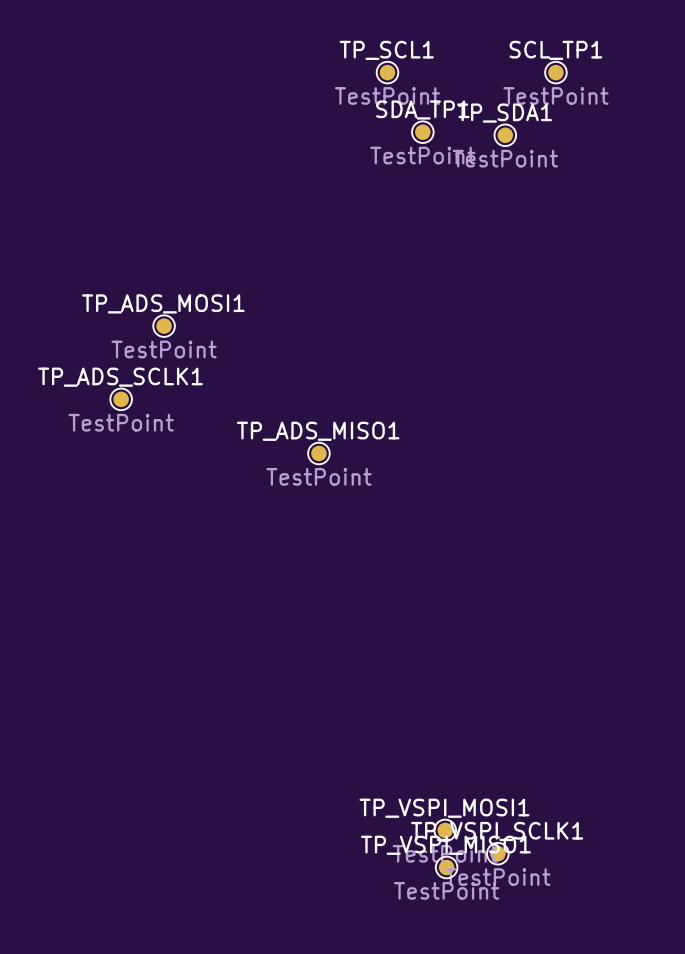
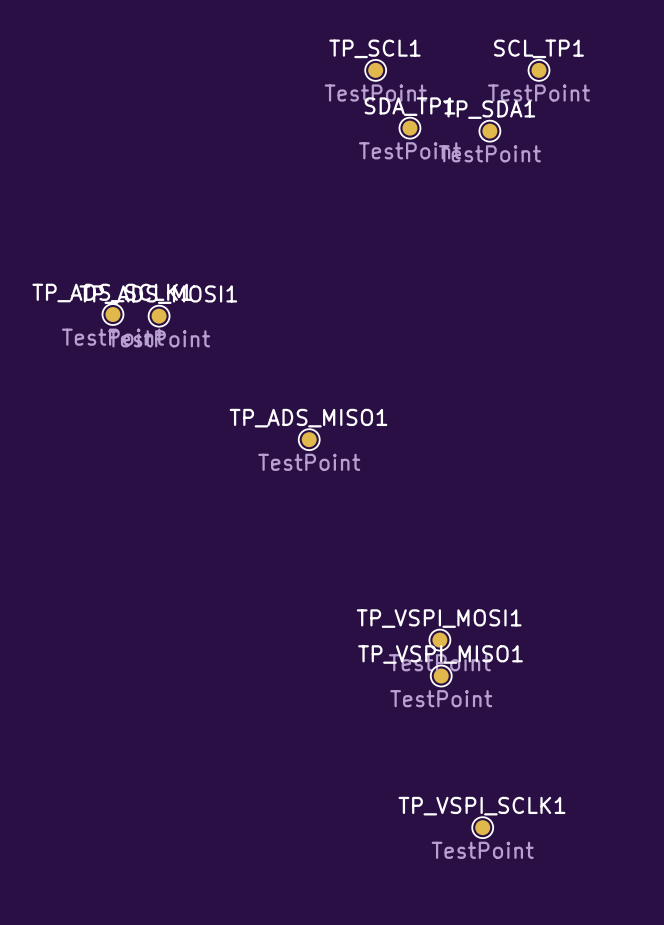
TP_ADS_SCLK1 position: (121, 399) -> (112, 314)
TP_VSPI_MOSI1 position: (445, 830) -> (439, 640)
TP_VSPI_MISO1 position: (446, 867) -> (441, 676)

